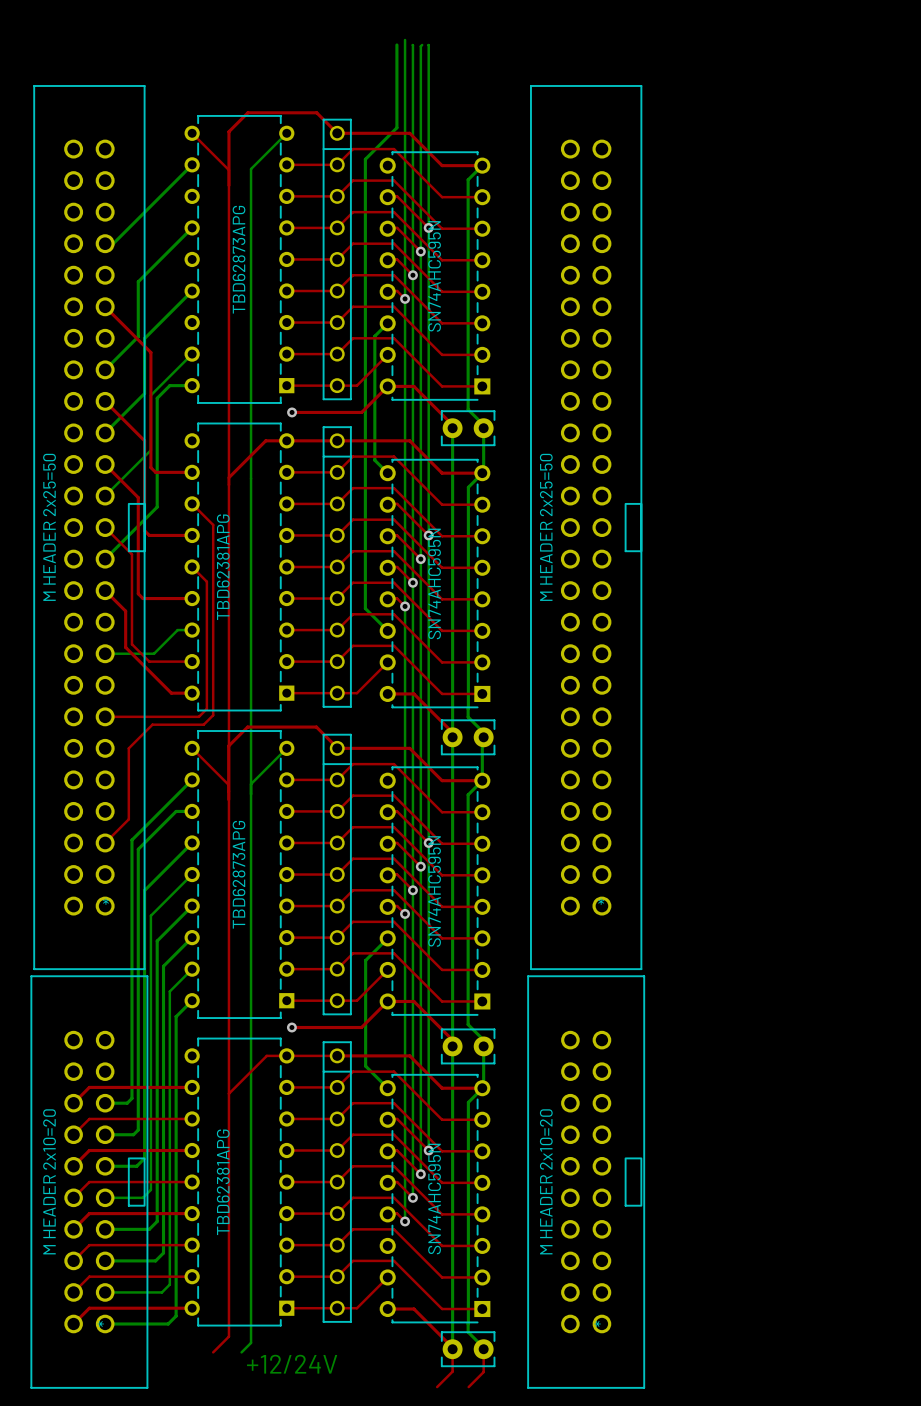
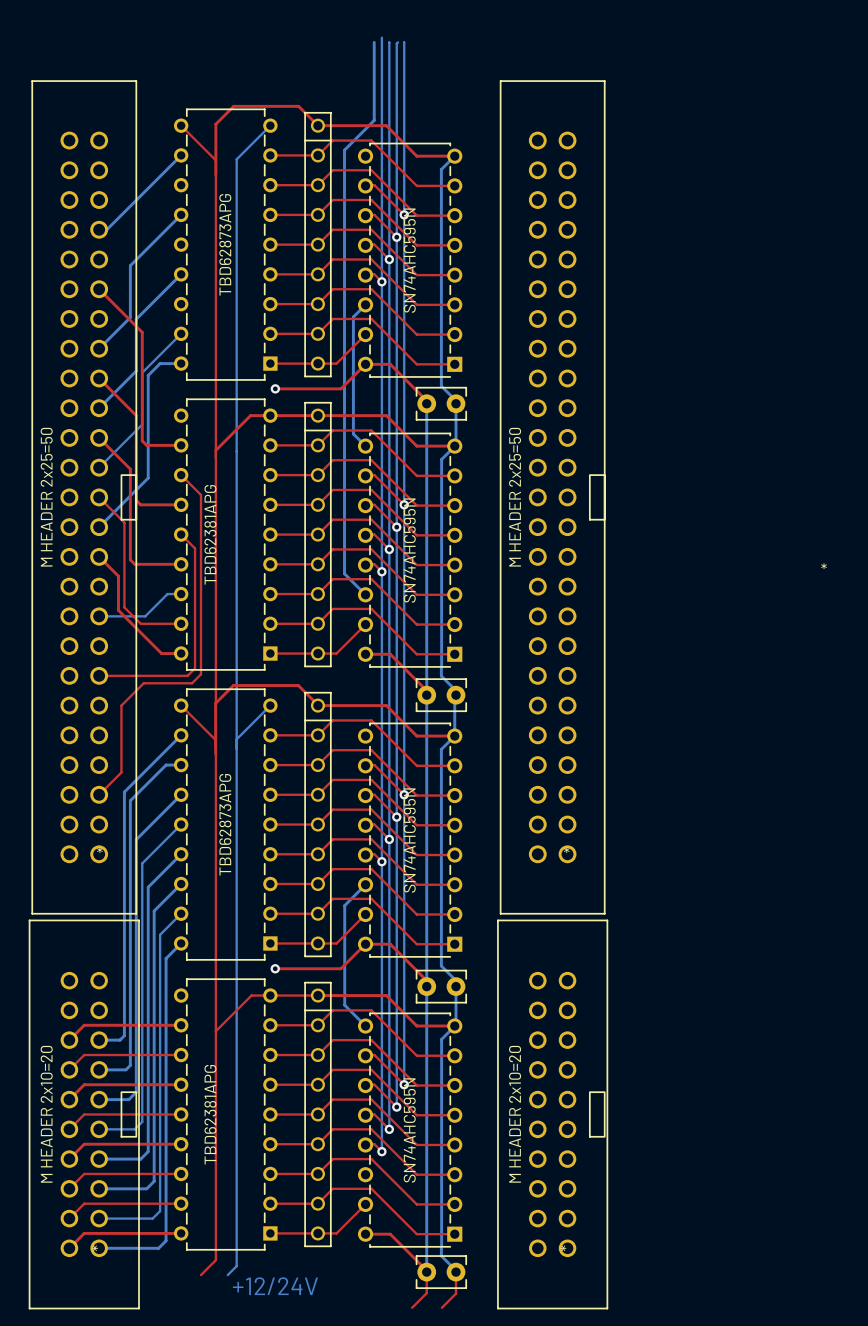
text: none -> * (824, 566)

